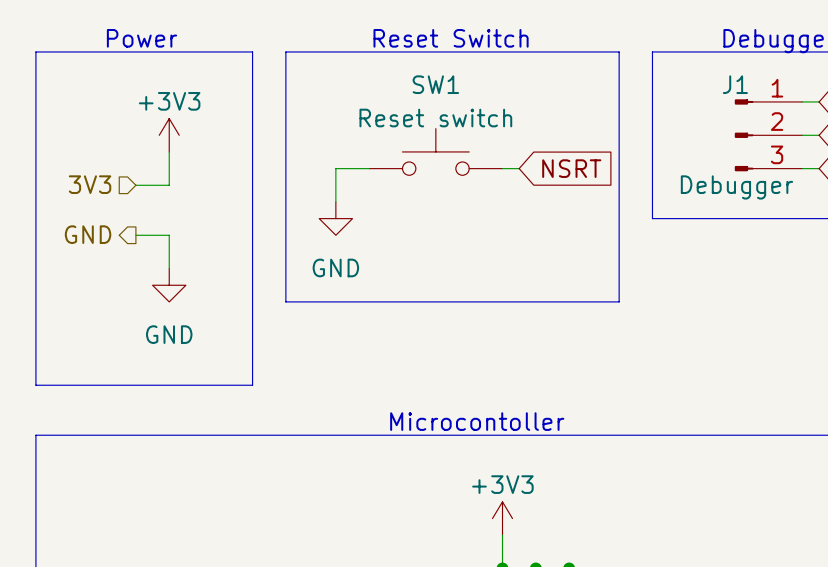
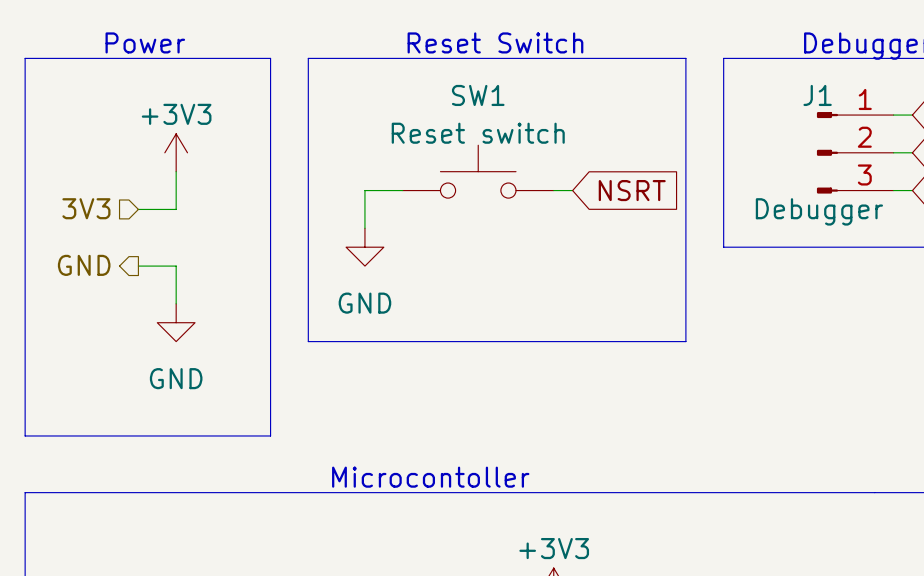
text position: Microcontoller (477, 421) -> Microcontoller (430, 477)

